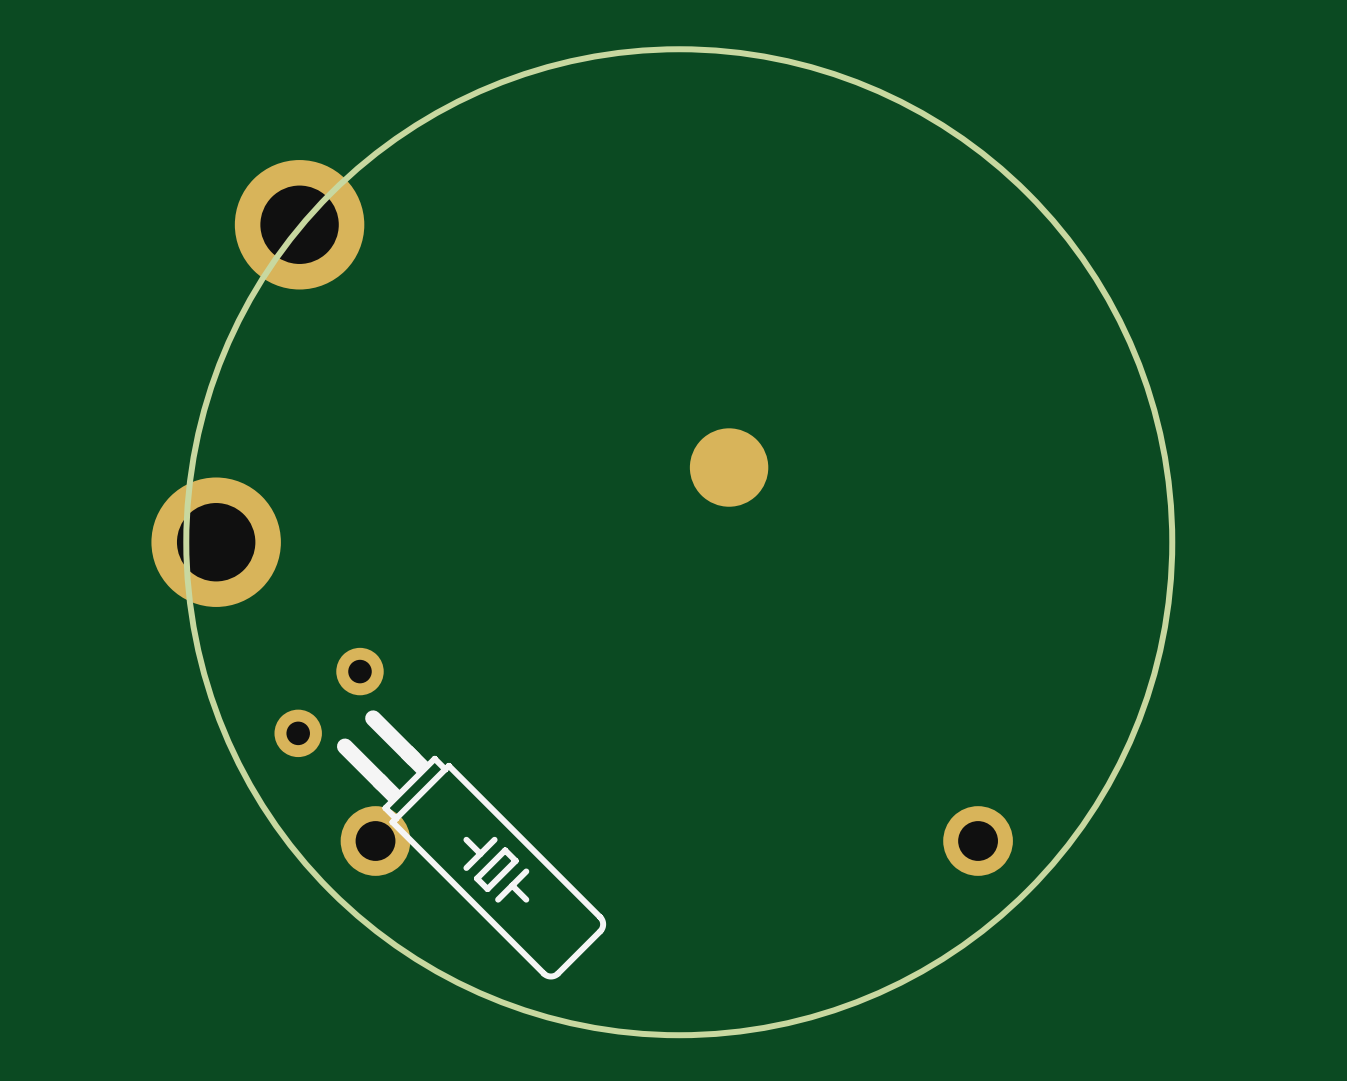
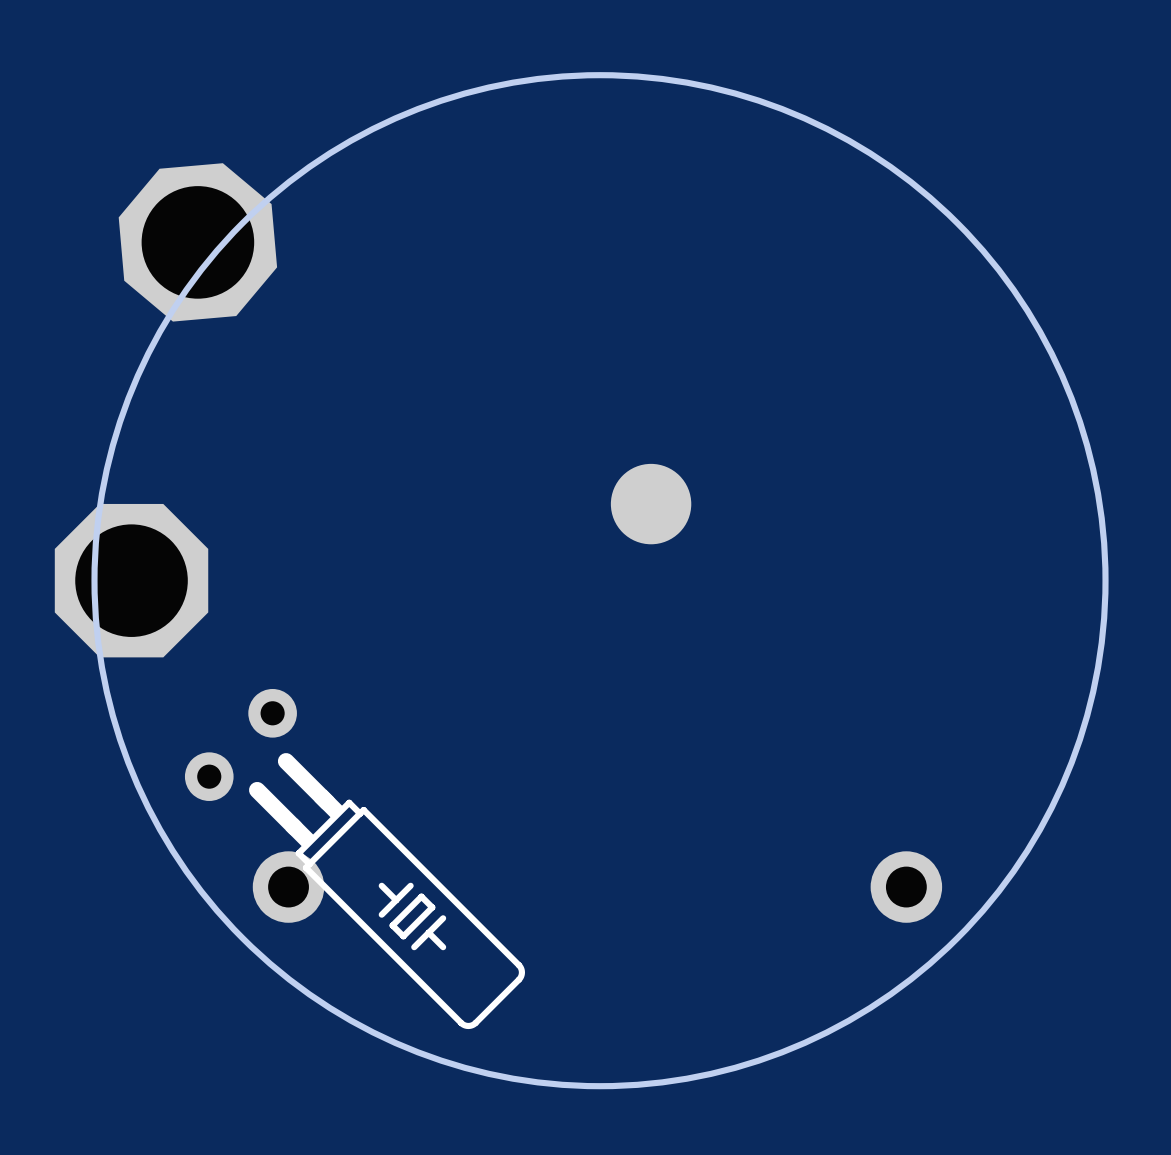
part footprint: [234, 160, 365, 290] -> [118, 163, 278, 322]
part footprint: [151, 477, 281, 607] -> [54, 503, 209, 658]

